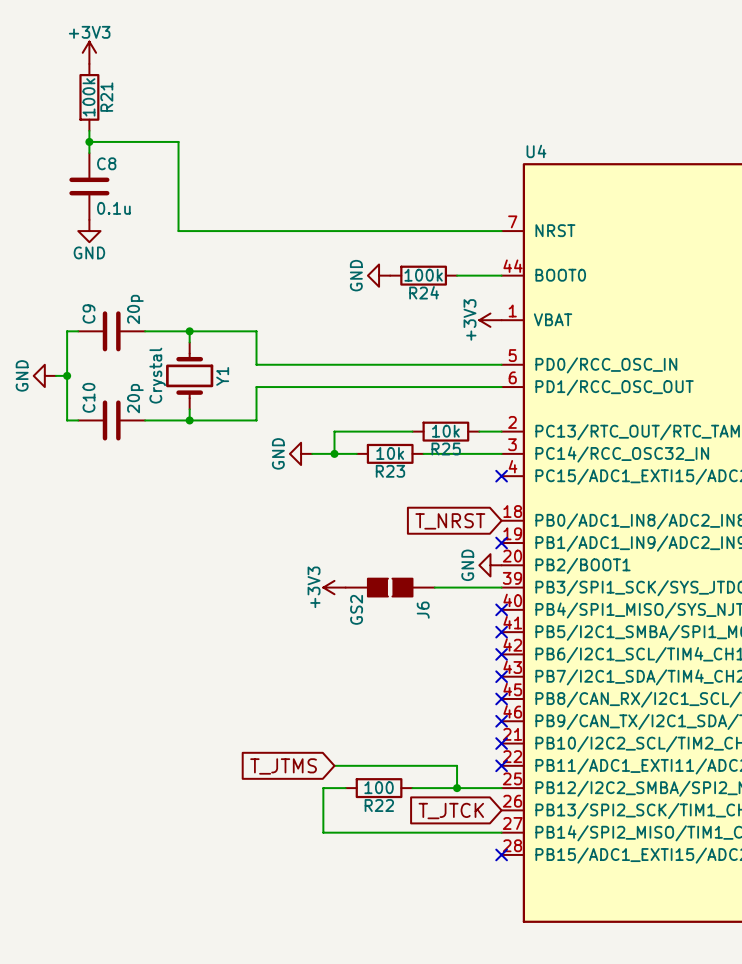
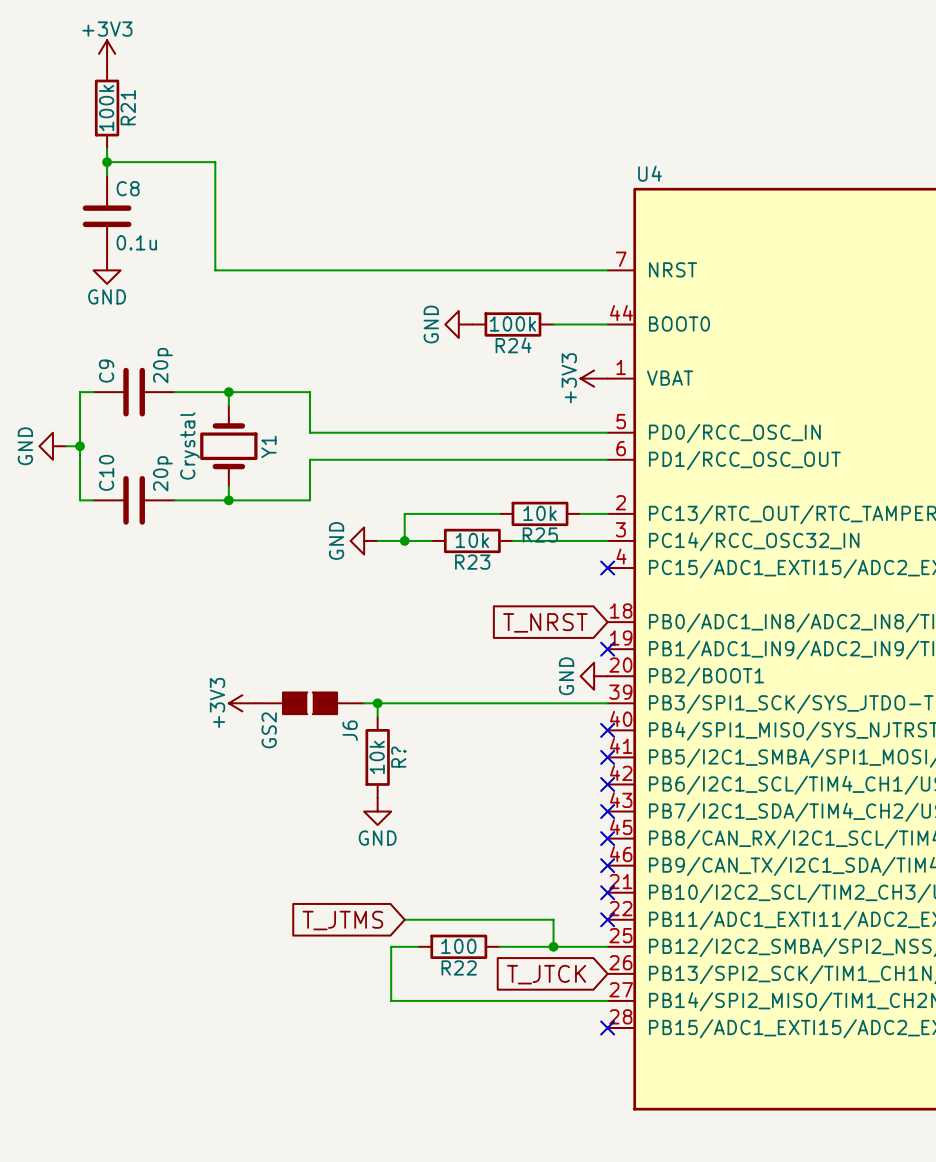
wire: none -> (377, 703) (377, 716)
junction: none -> (377, 703)
power symbol position: +3V3 (334, 587) -> +3V3 (242, 703)
J6 position: (390, 587) -> (310, 703)
R?: none -> 10k (377, 757)
power symbol: none -> GND (377, 811)

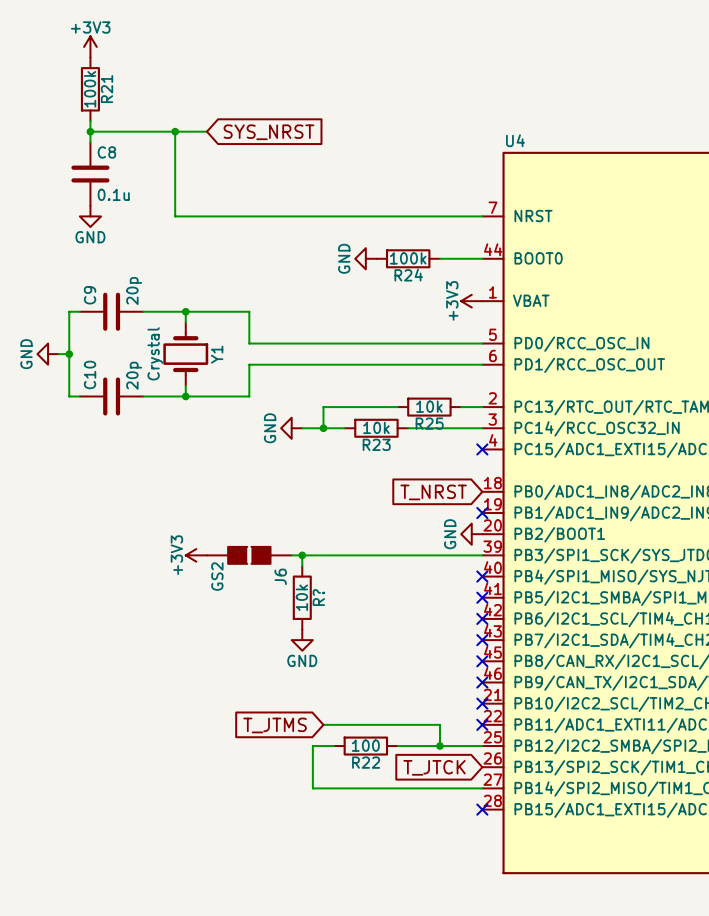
wire: none -> (175, 131) (206, 131)
junction: none -> (175, 131)
global label: none -> SYS_NRST (269, 132)

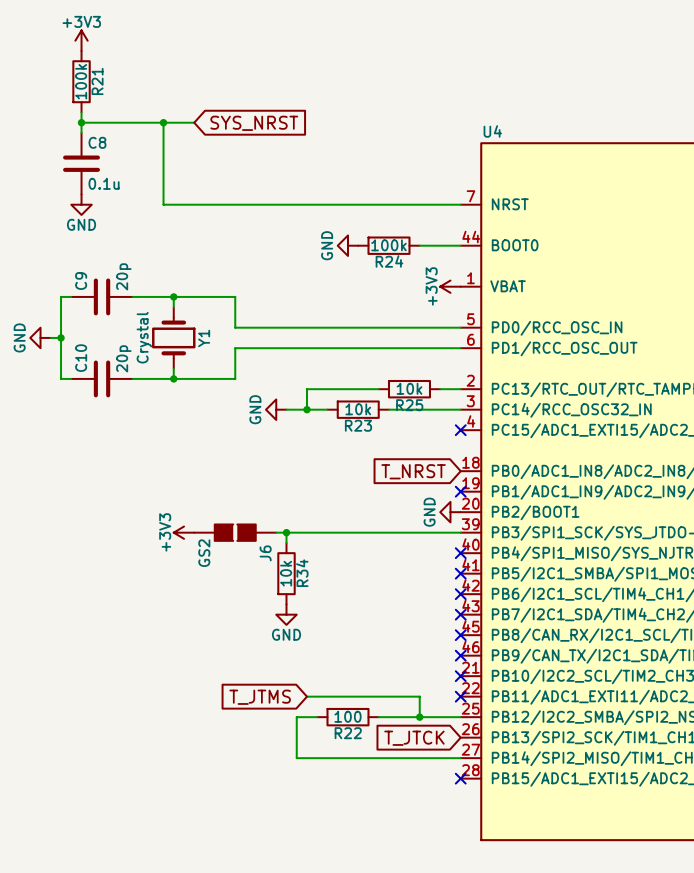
R? name: R? (318, 597) -> R34 (302, 573)

